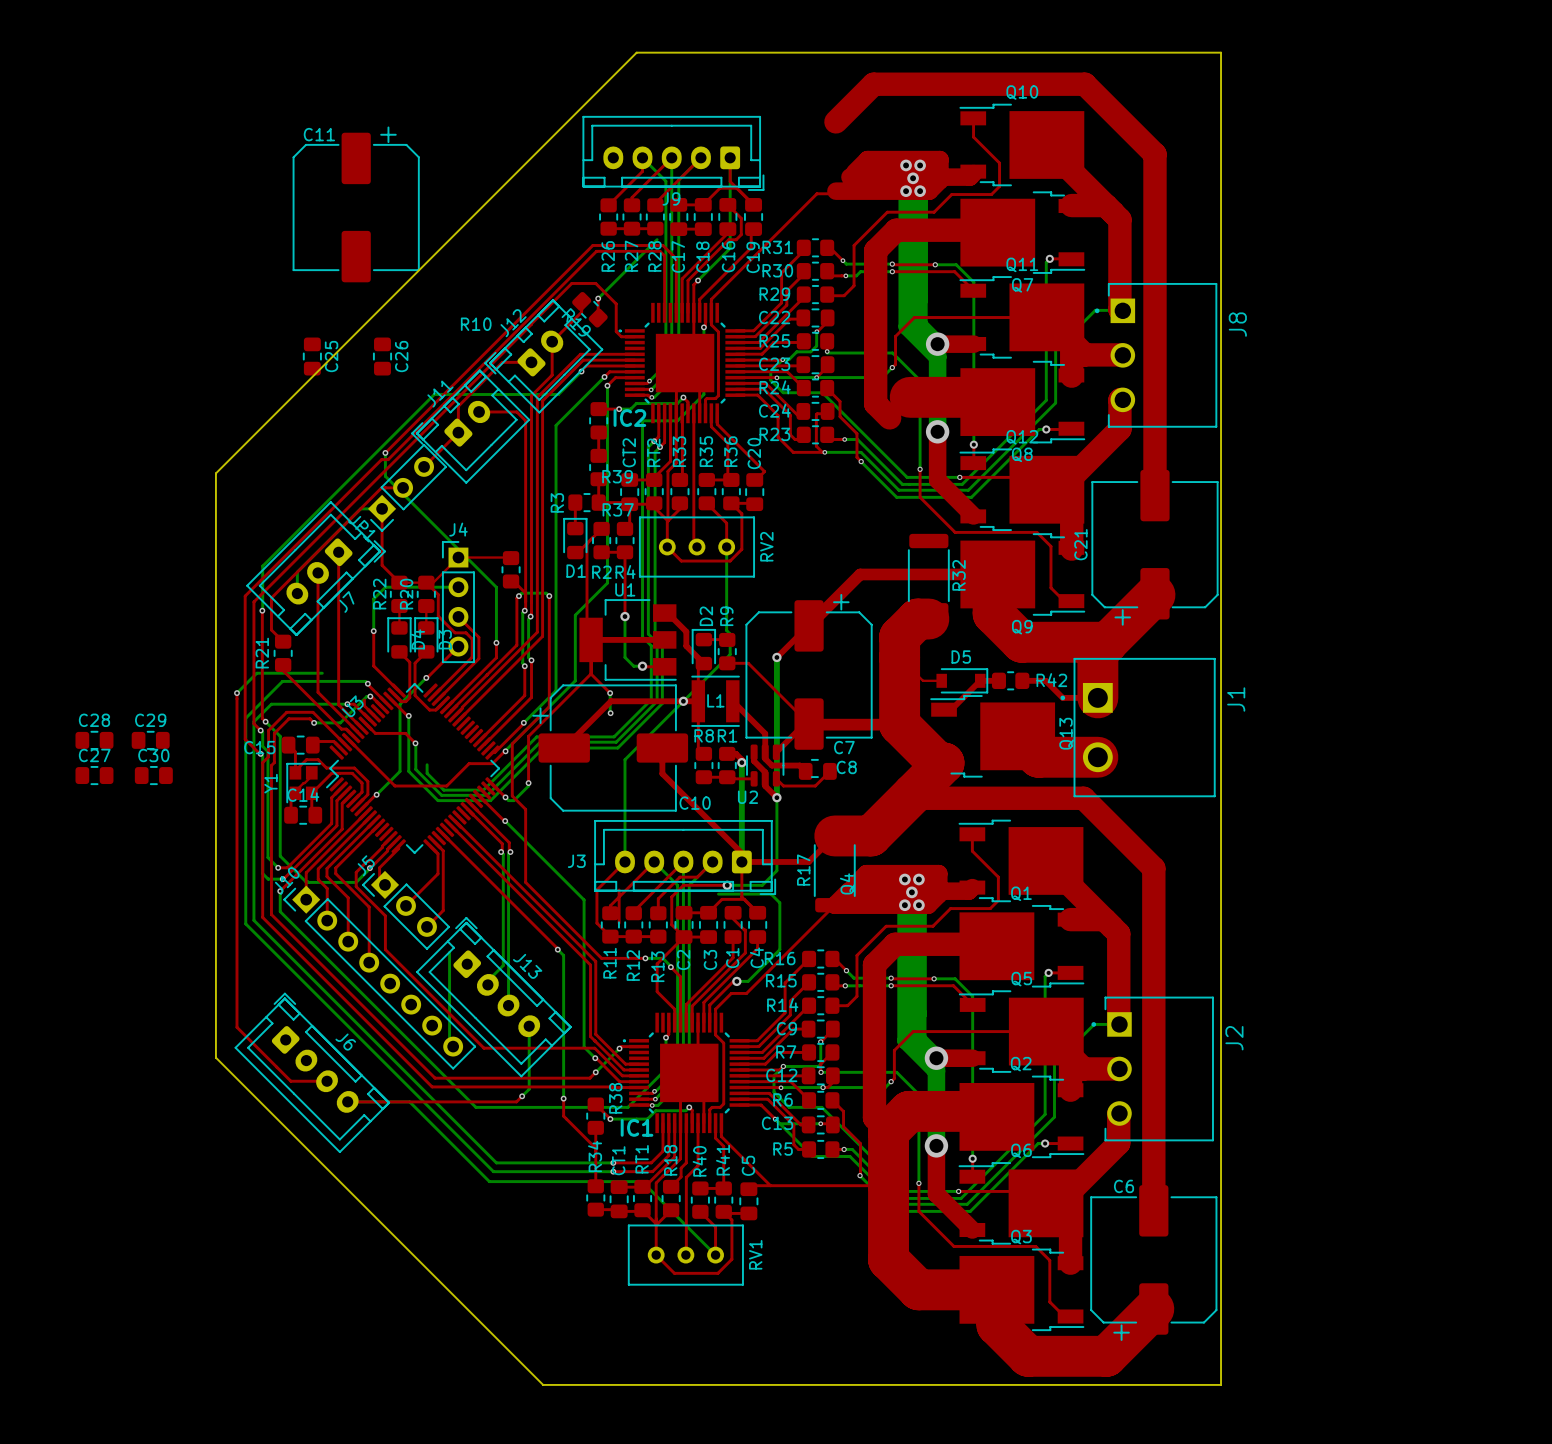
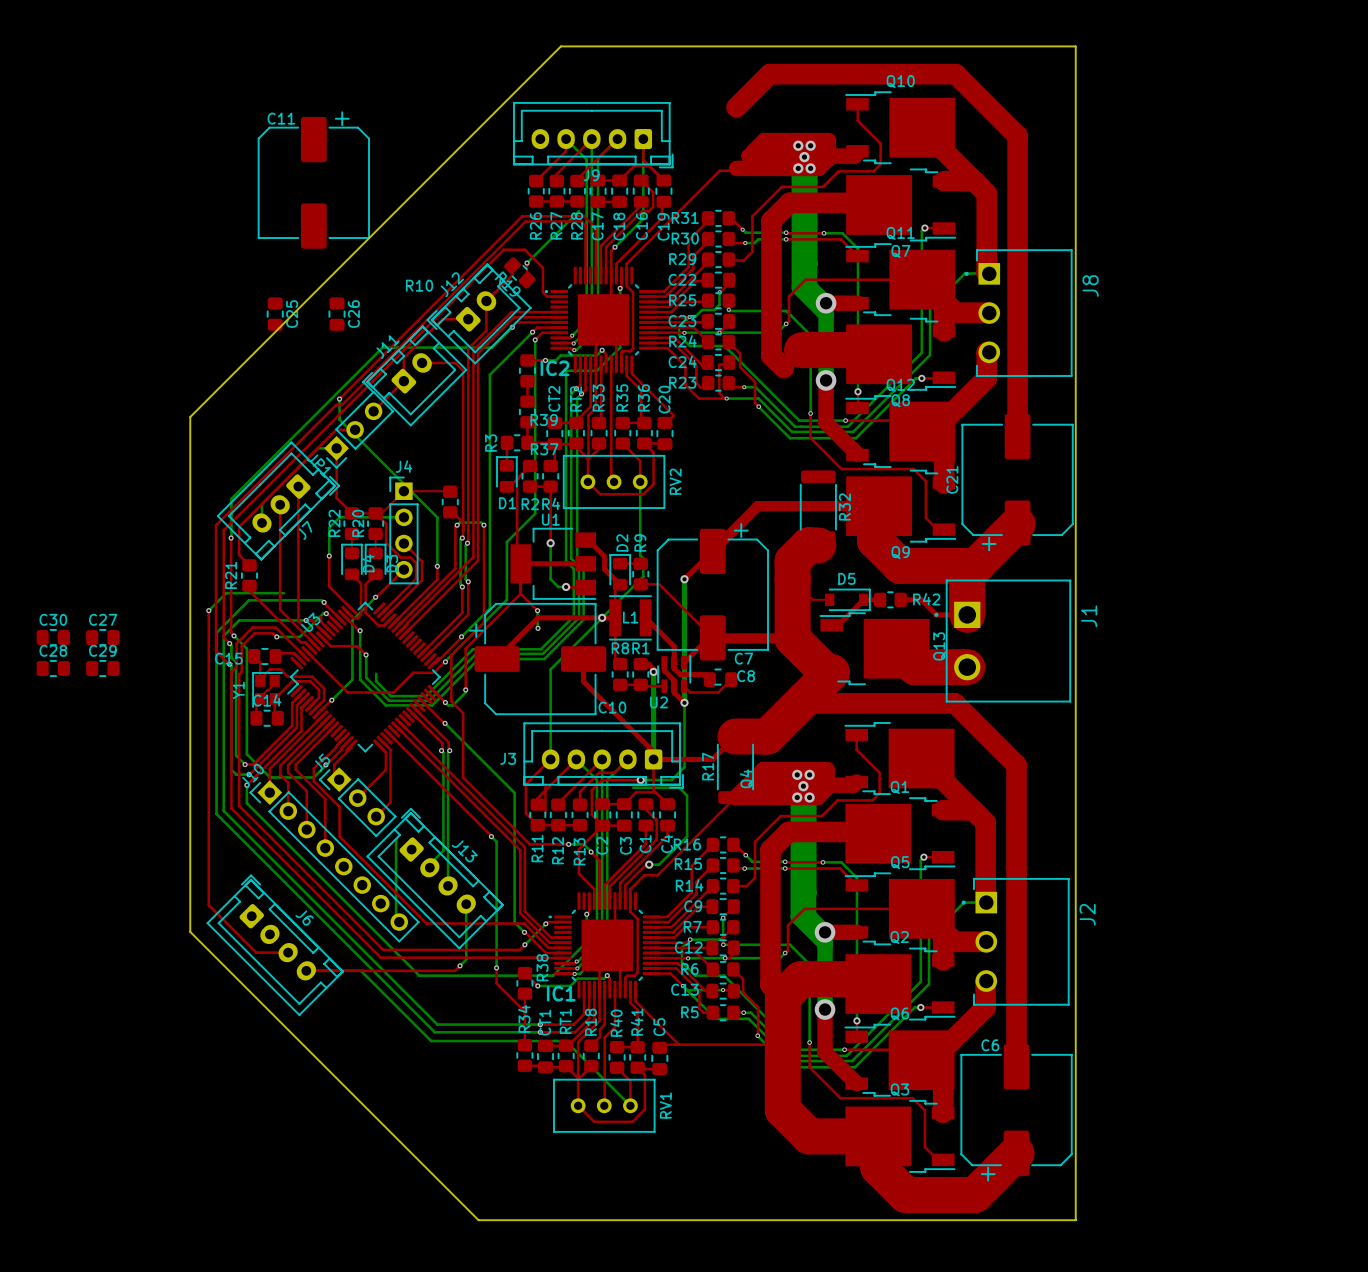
C28 position: (94, 740) -> (53, 668)
C29 position: (150, 740) -> (102, 668)
C27 position: (94, 775) -> (102, 637)
C30 position: (153, 775) -> (53, 637)

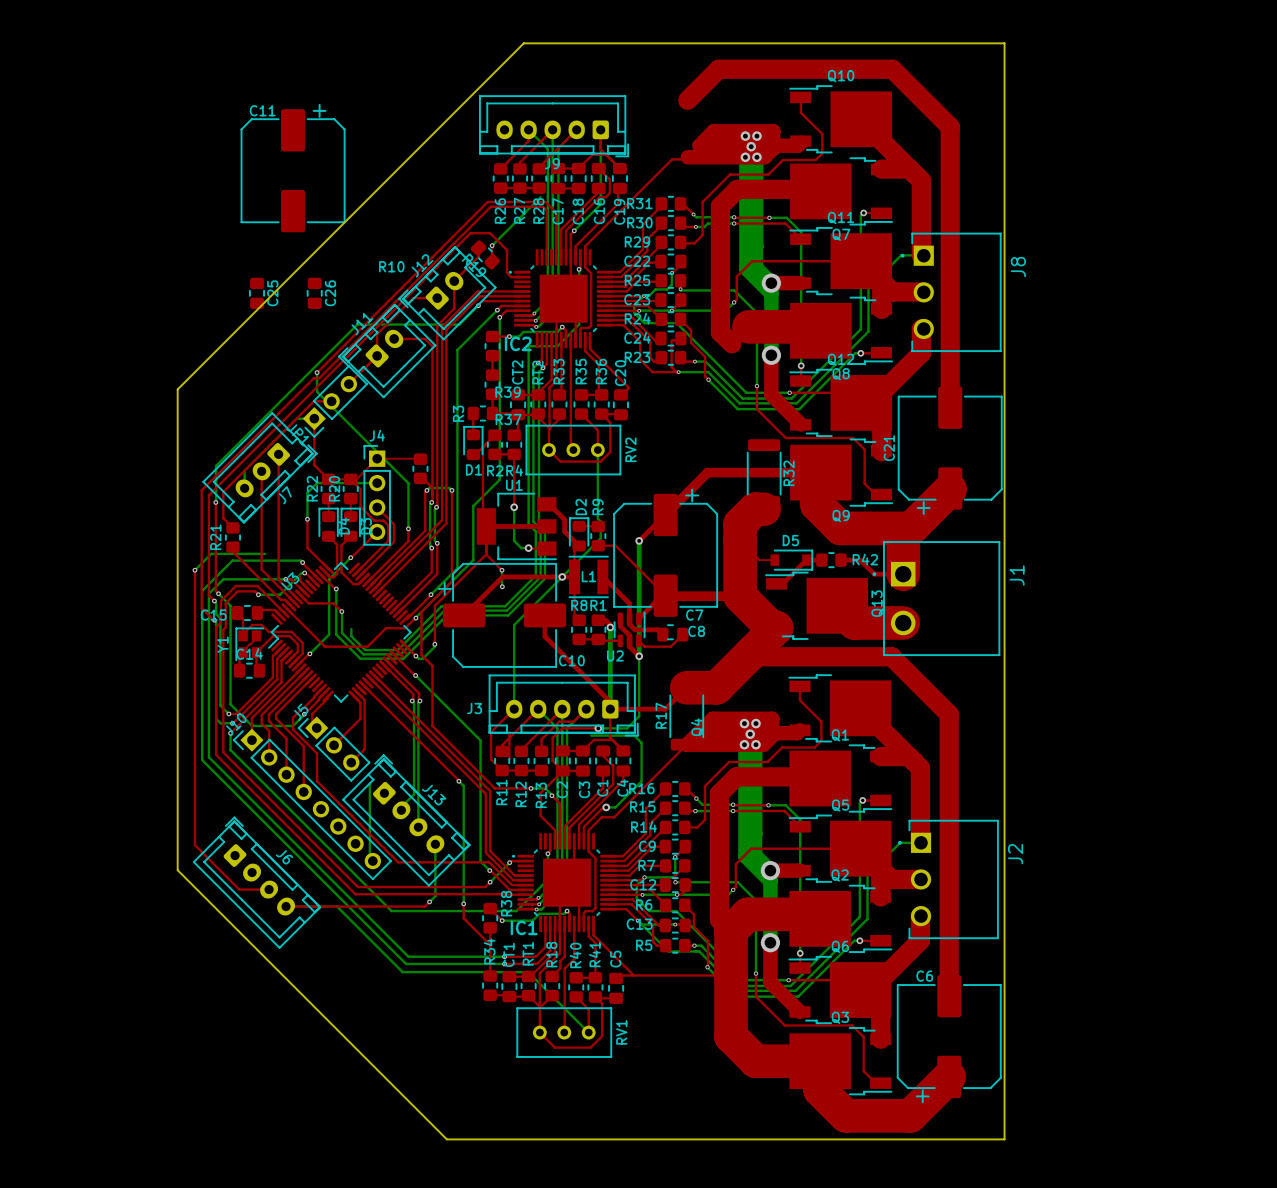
C30: (53, 637) -> none
C27: (102, 637) -> none
C28: (53, 668) -> none
C29: (102, 668) -> none

